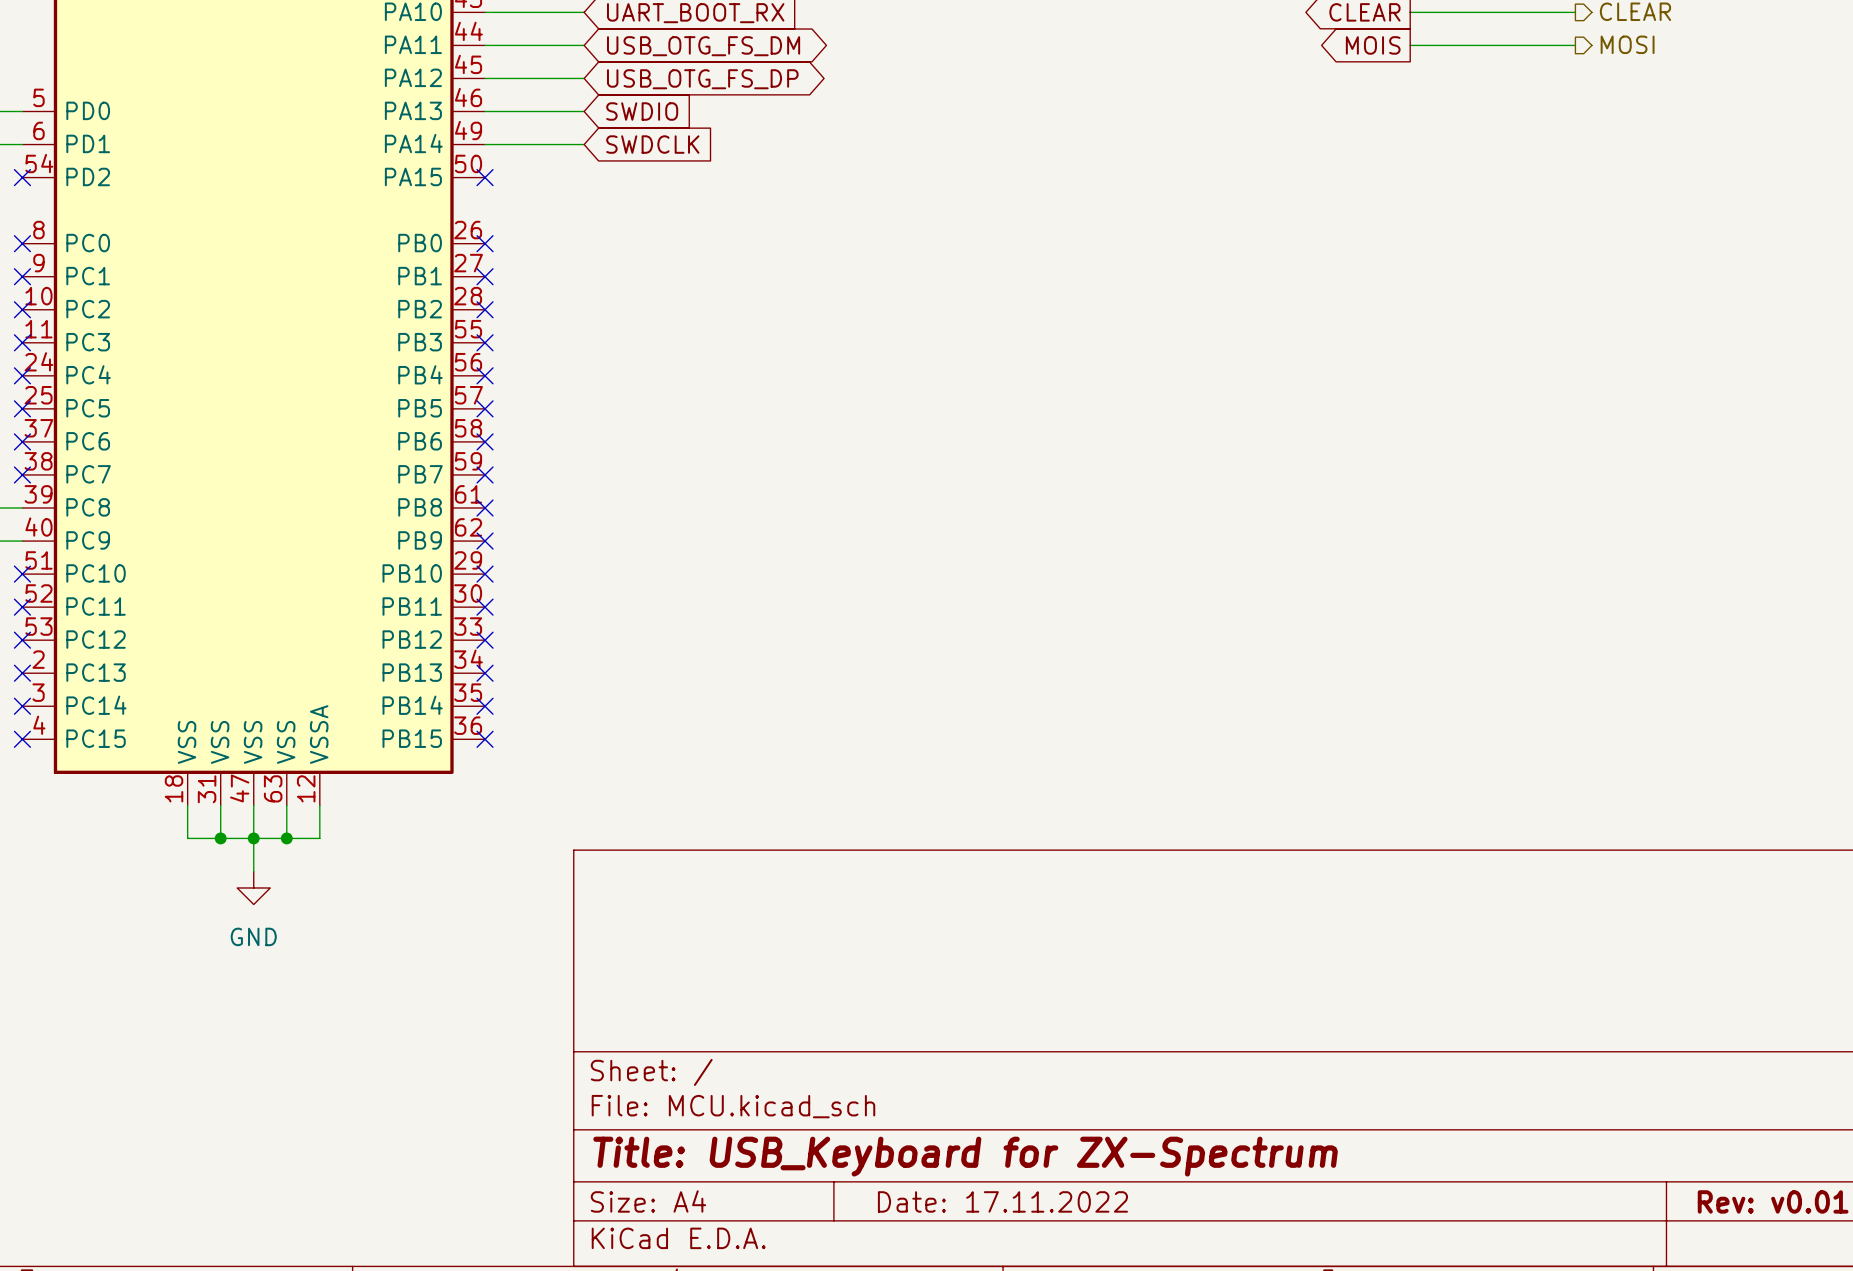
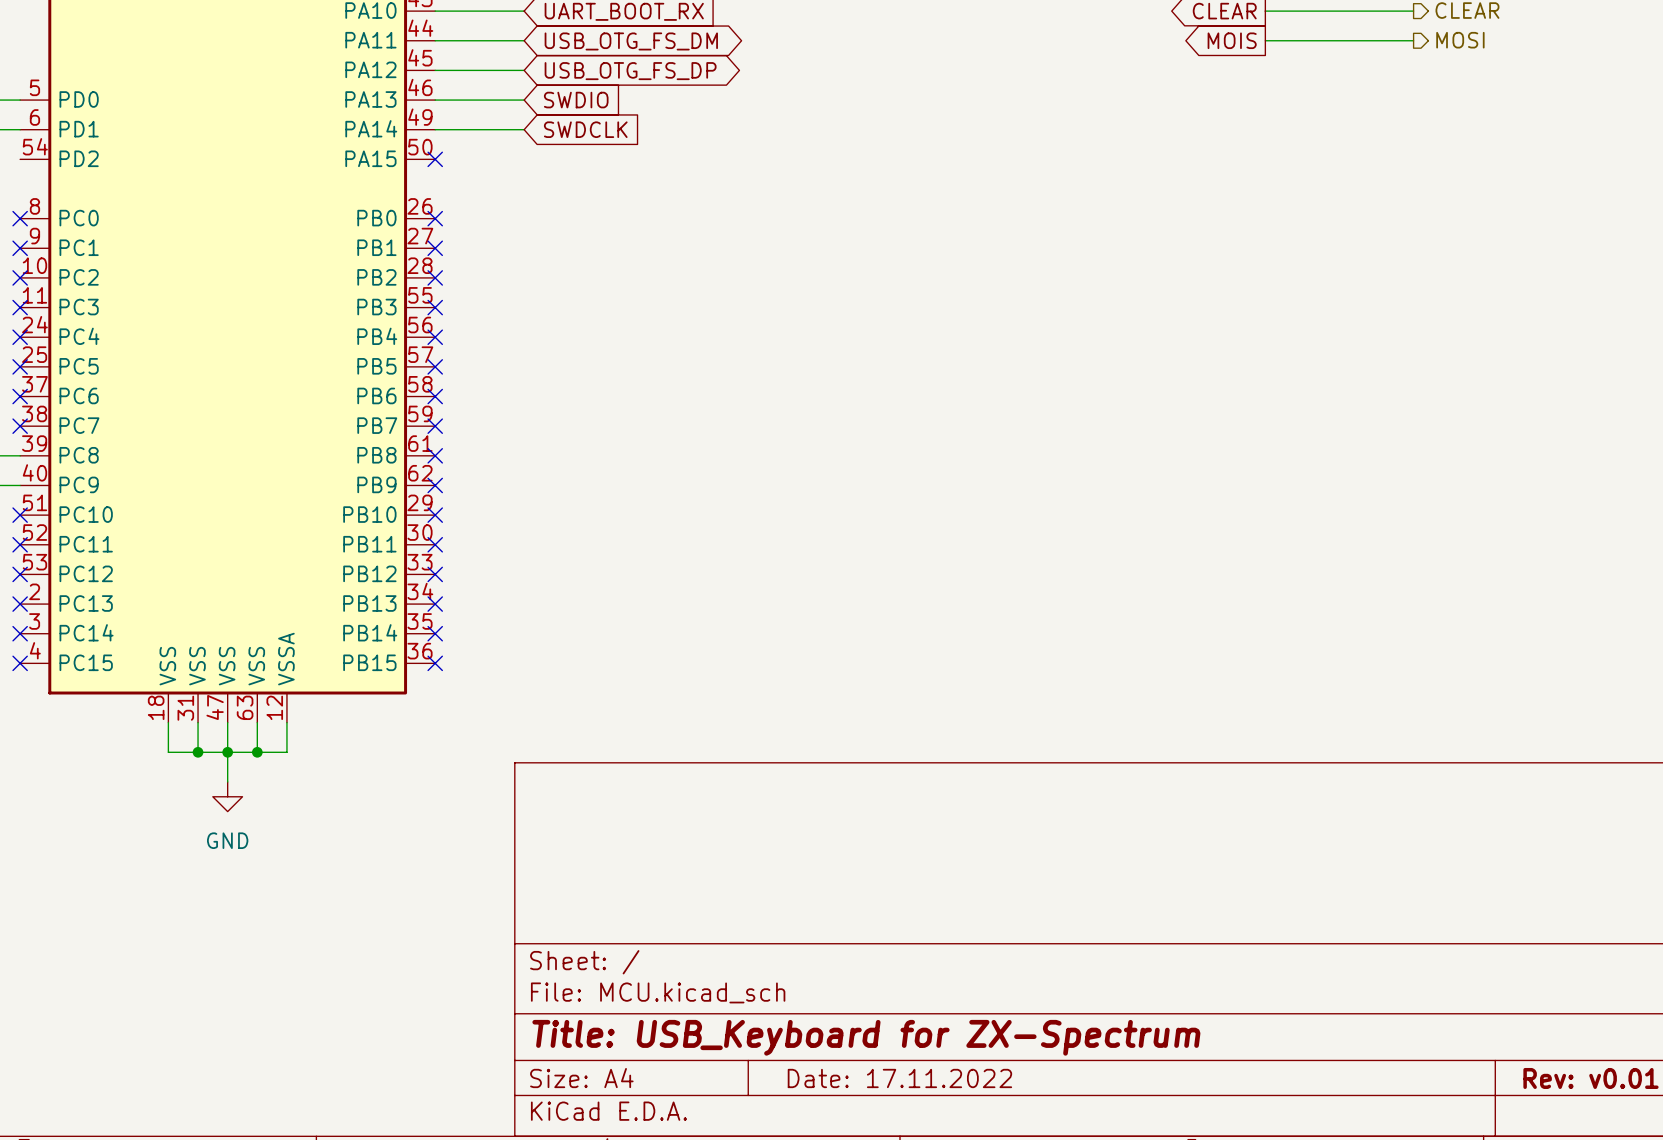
no-connect mark: (22, 177) -> none

